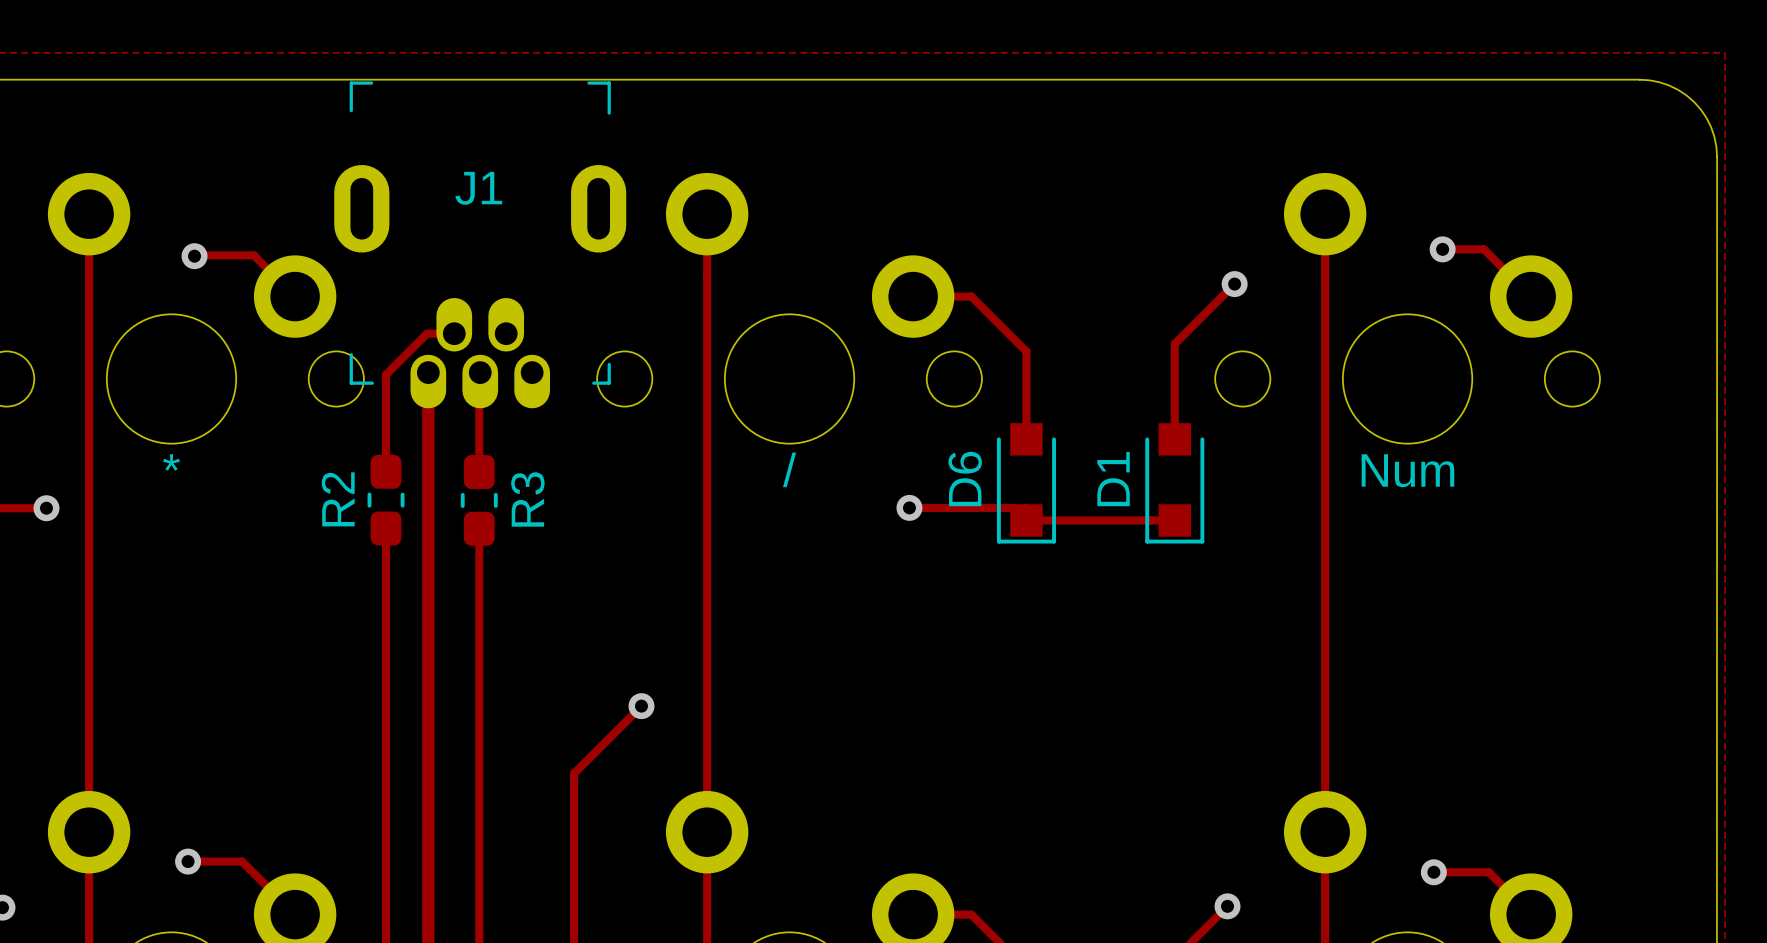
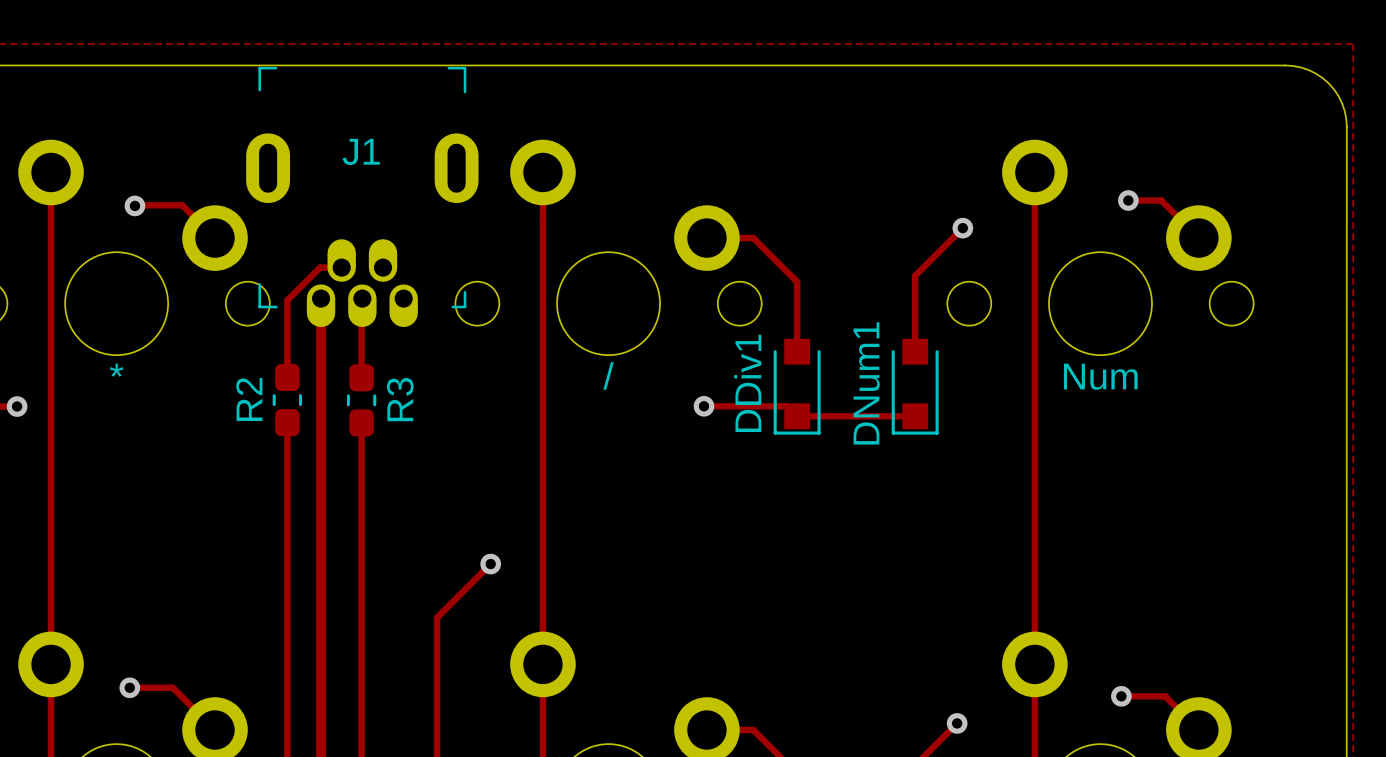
D6 name: D6 (965, 479) -> DDiv1 (747, 383)
D1 name: D1 (1113, 479) -> DNum1 (866, 383)

